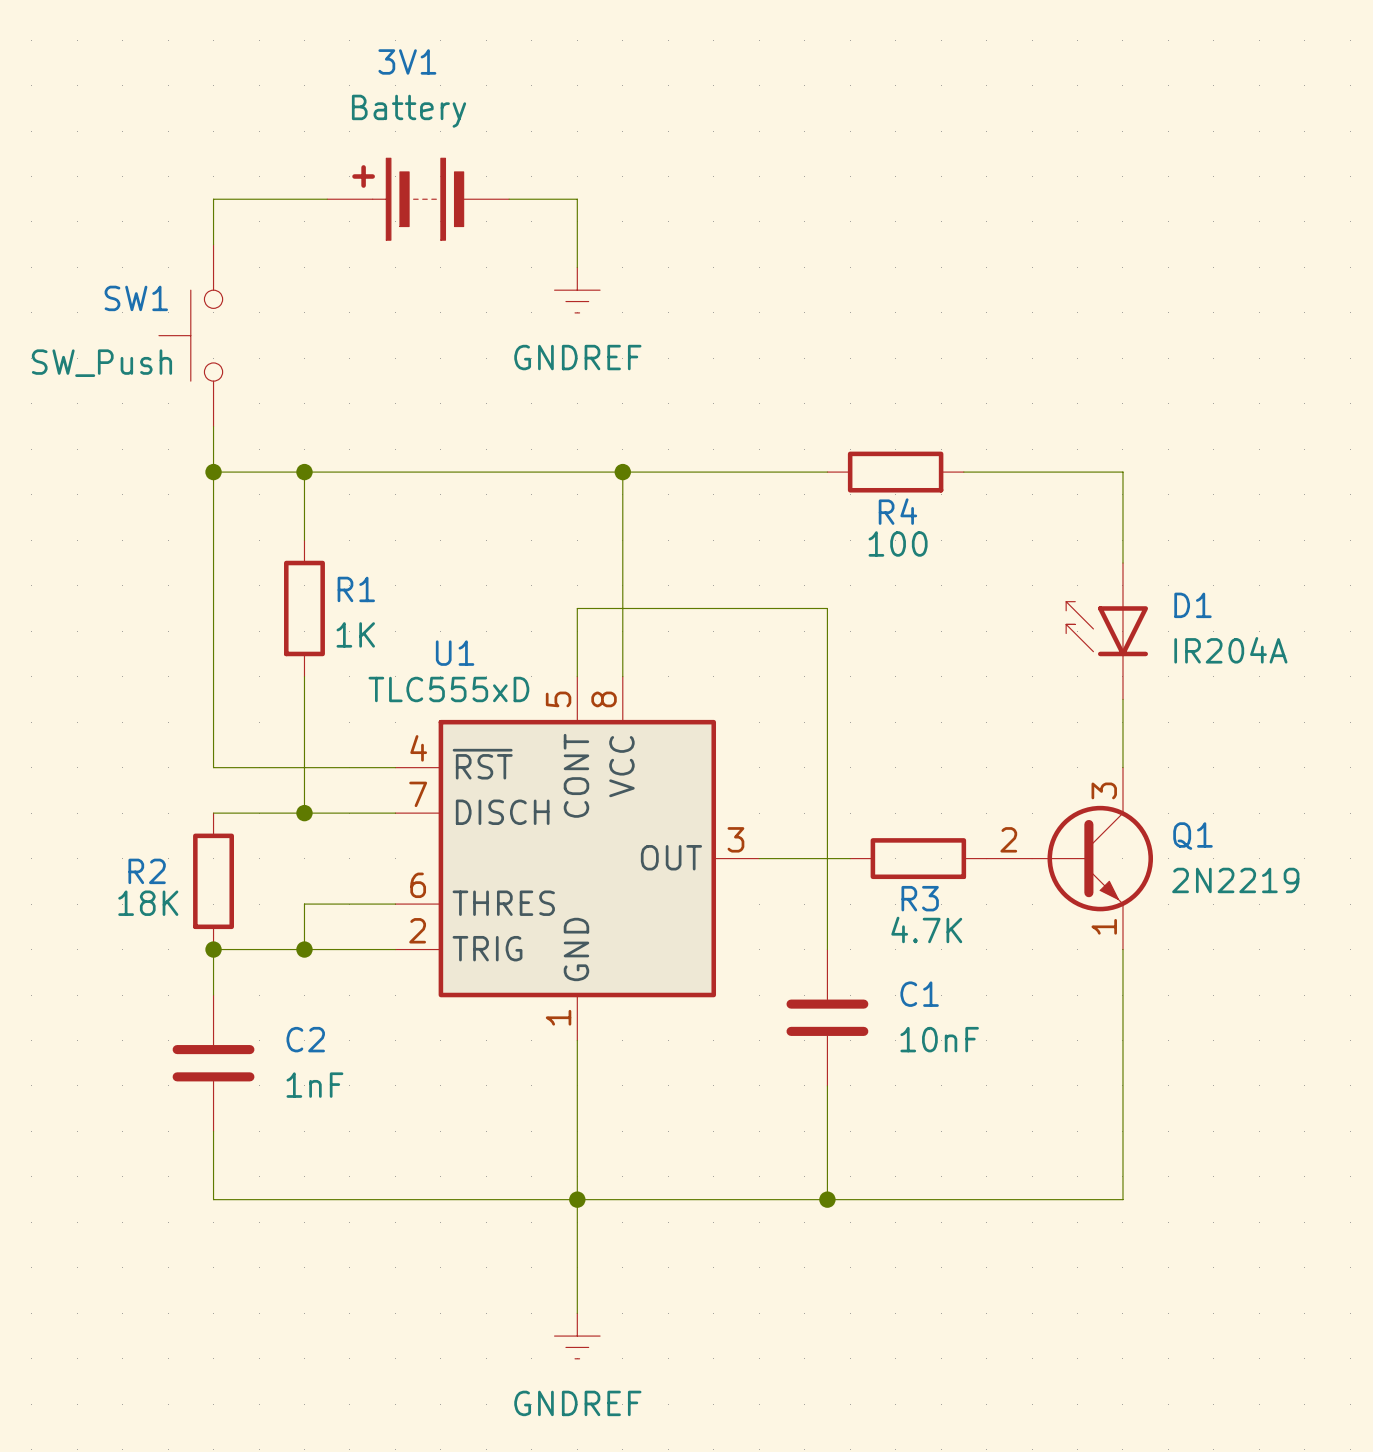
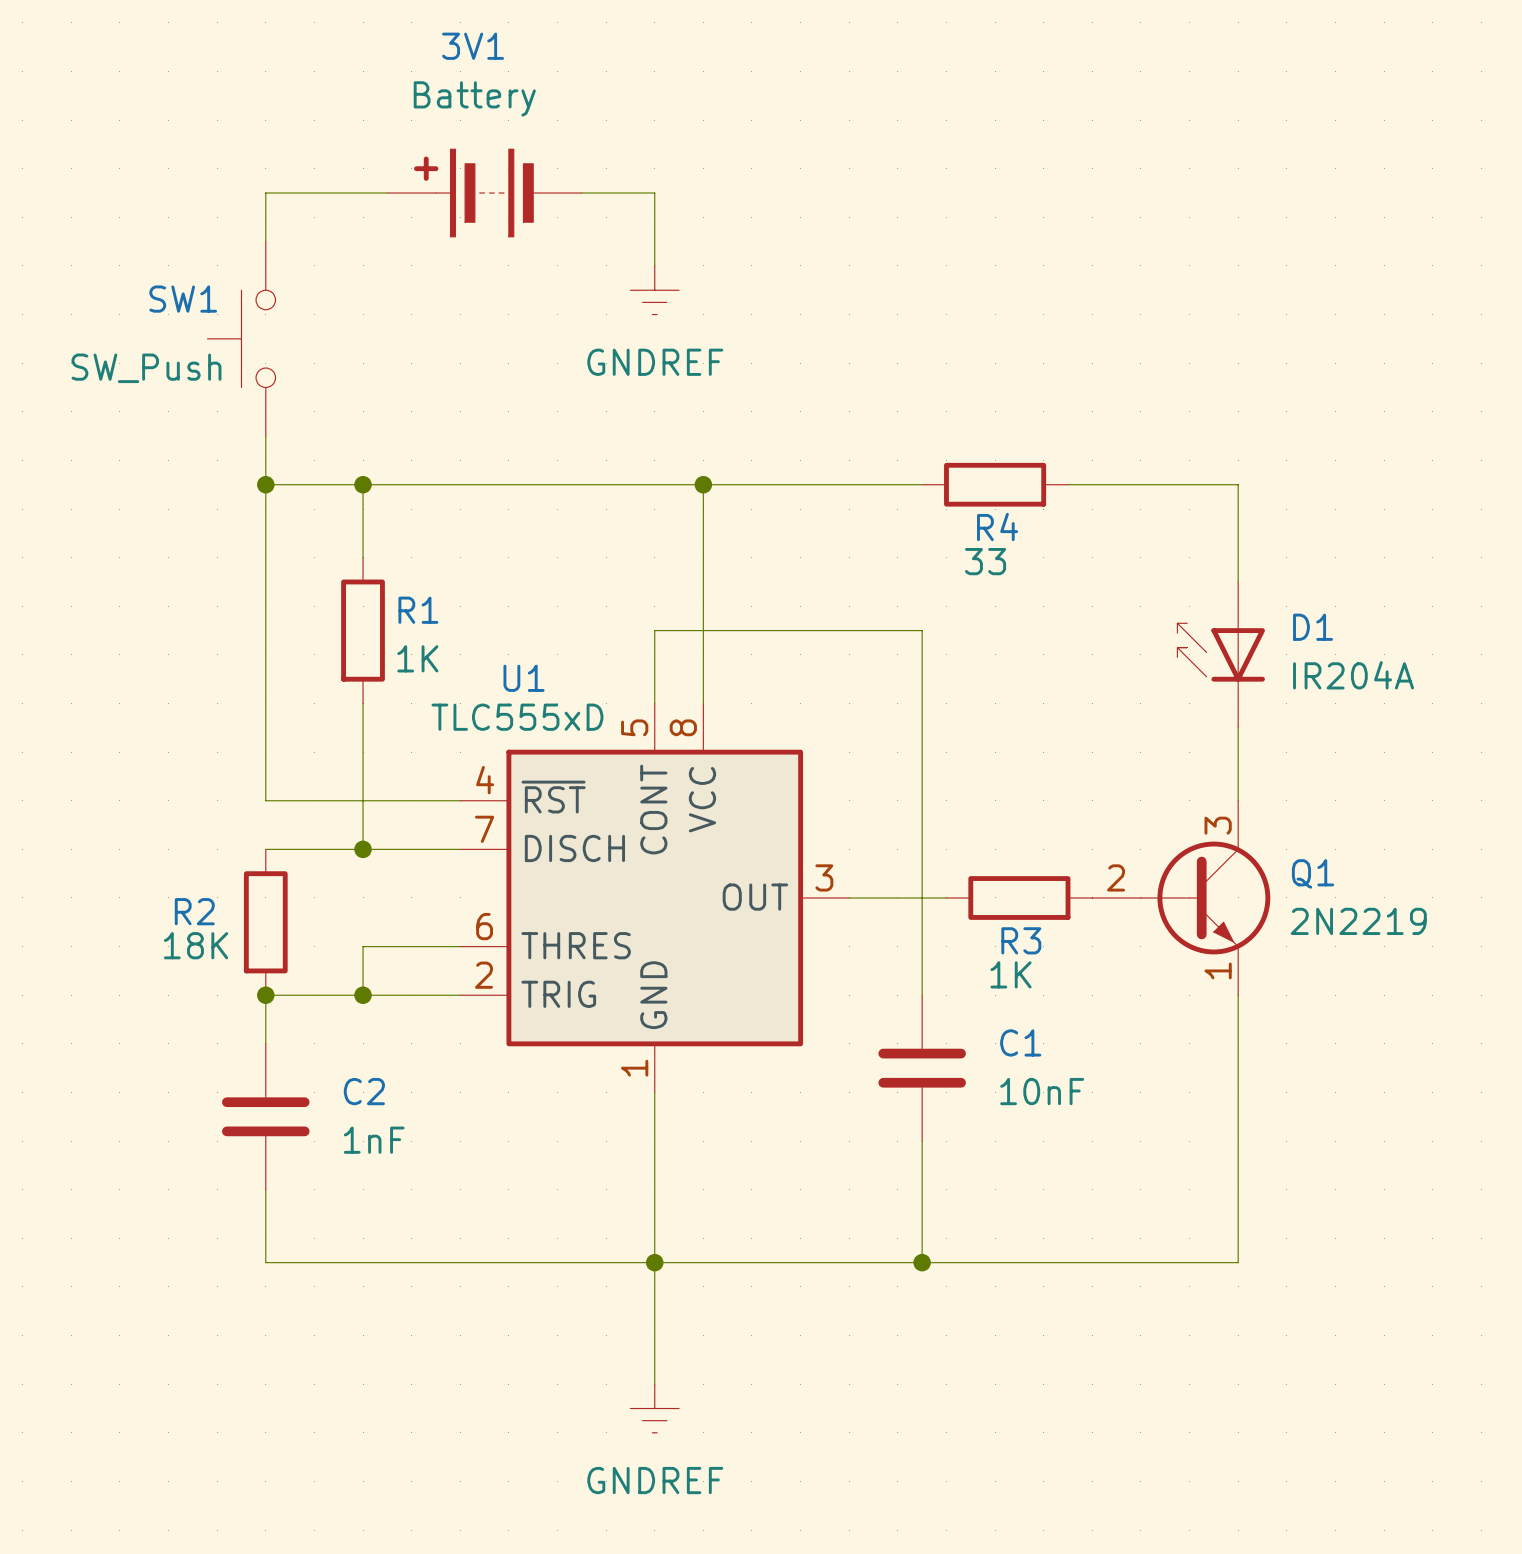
R4 value: 100 (898, 543) -> 33 (985, 561)
R3 value: 4.7K (926, 929) -> 1K (1011, 974)

